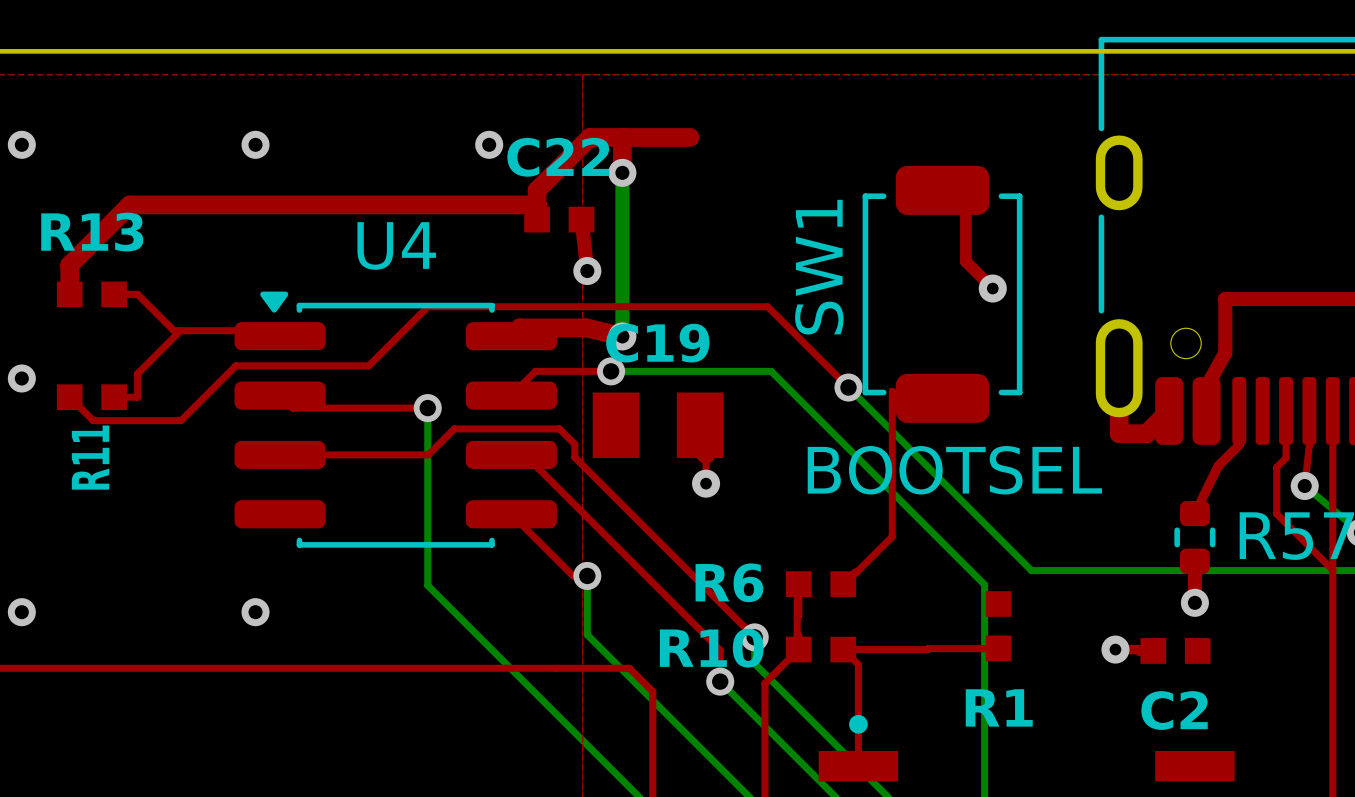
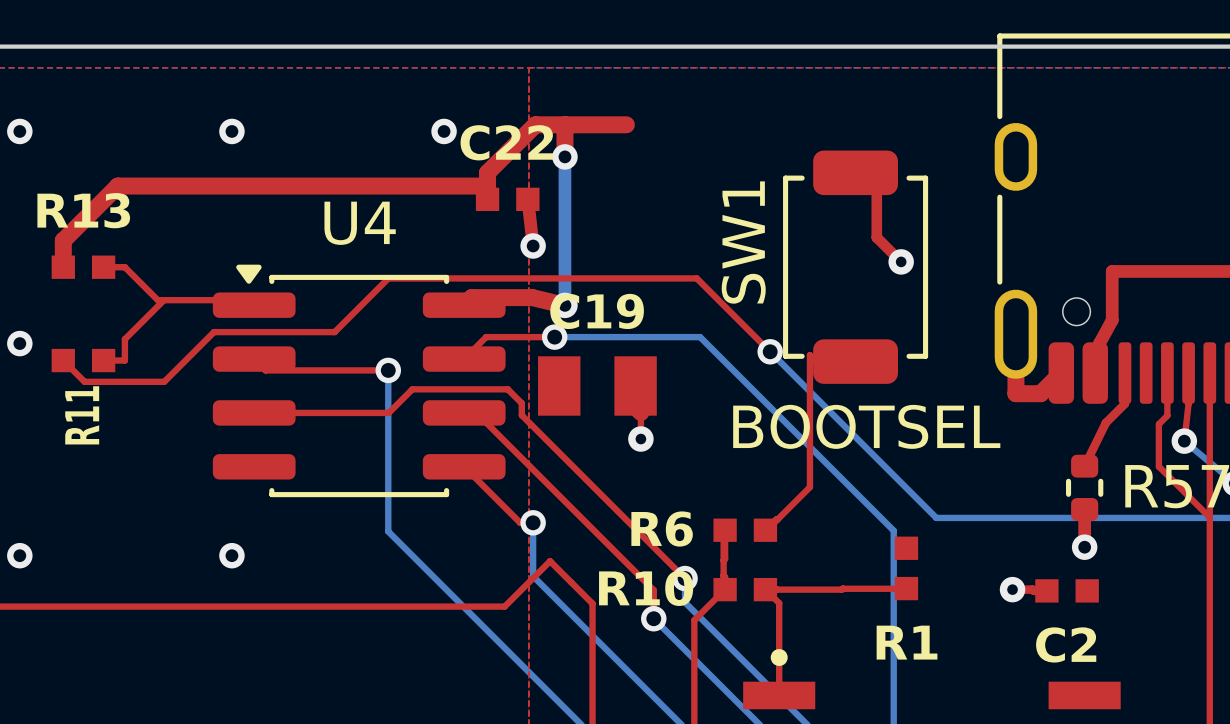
top track: (556, 668) (629, 668) (652, 691) -> (504, 606) (550, 561) (592, 603) (592, 627)

